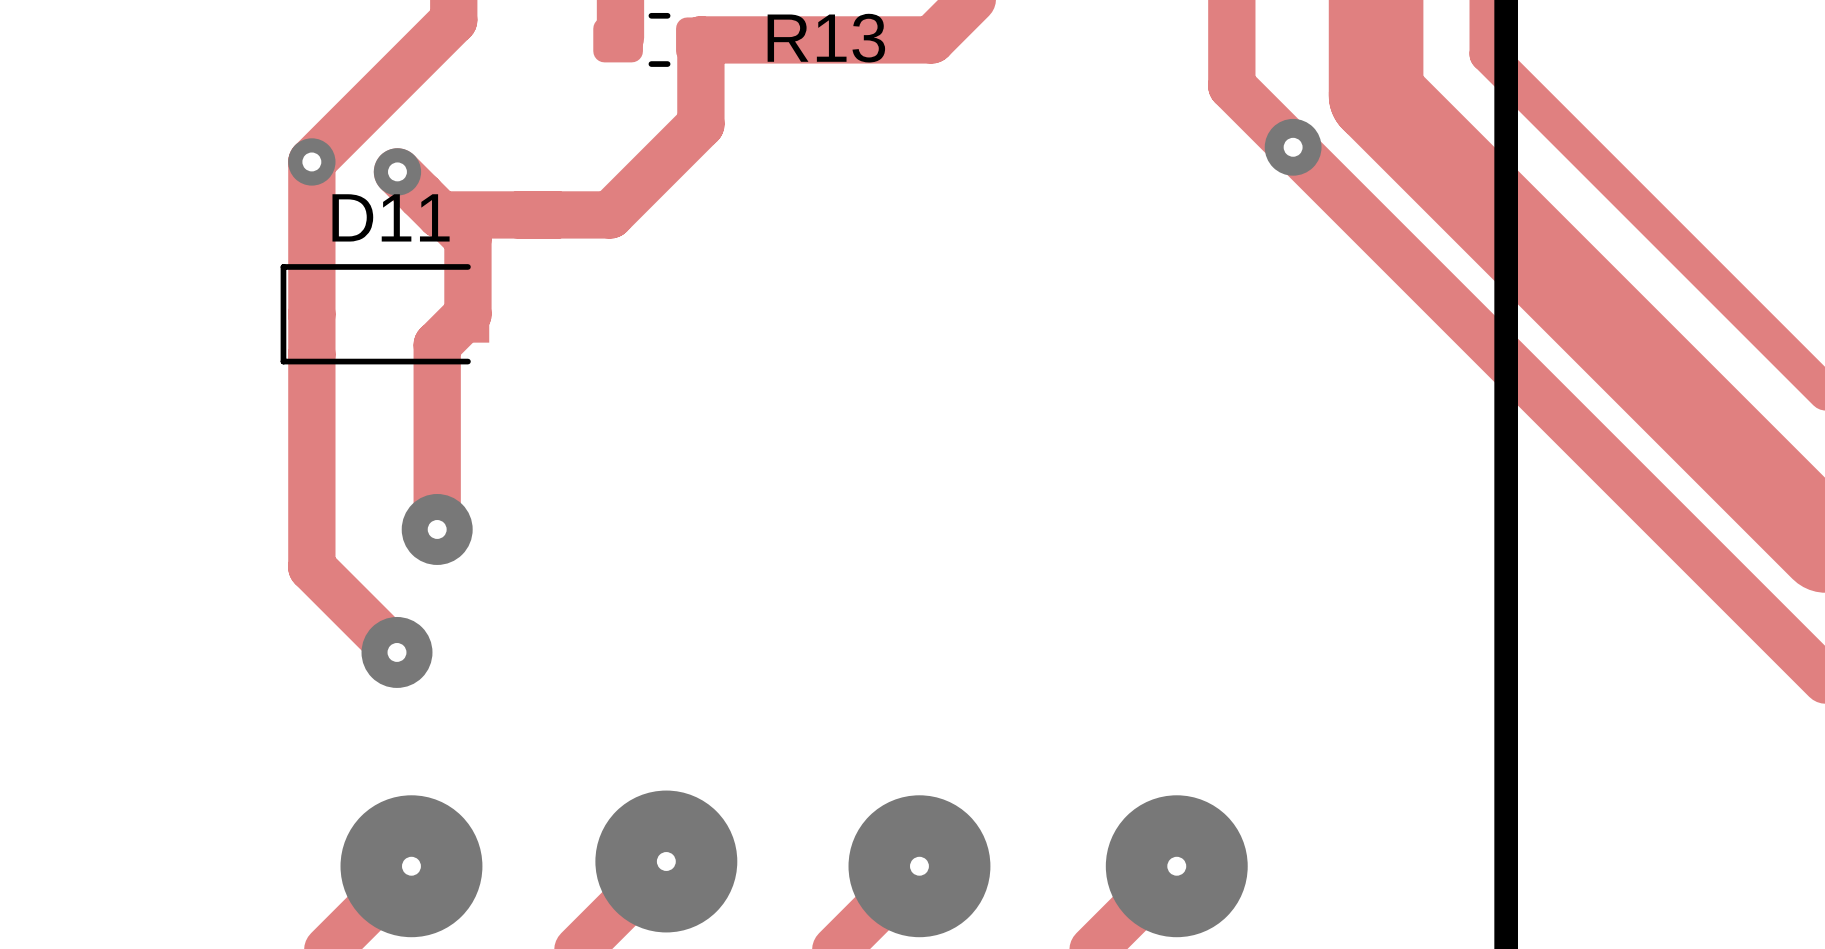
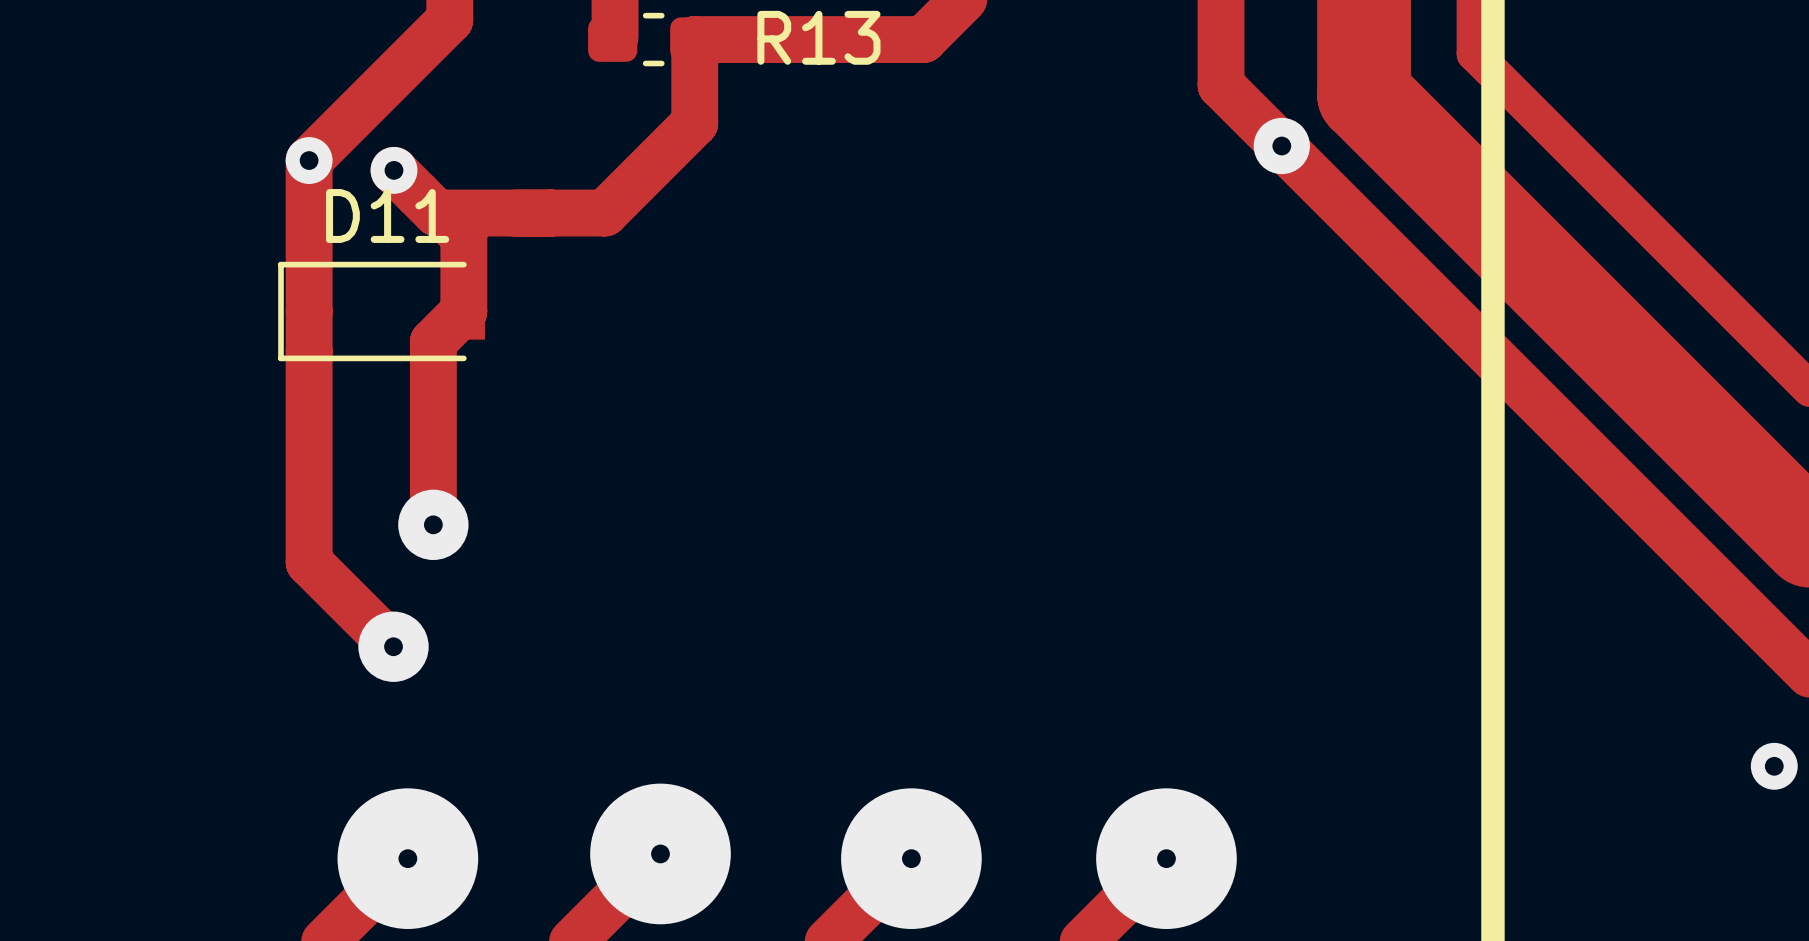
via: none -> (1774, 766)

